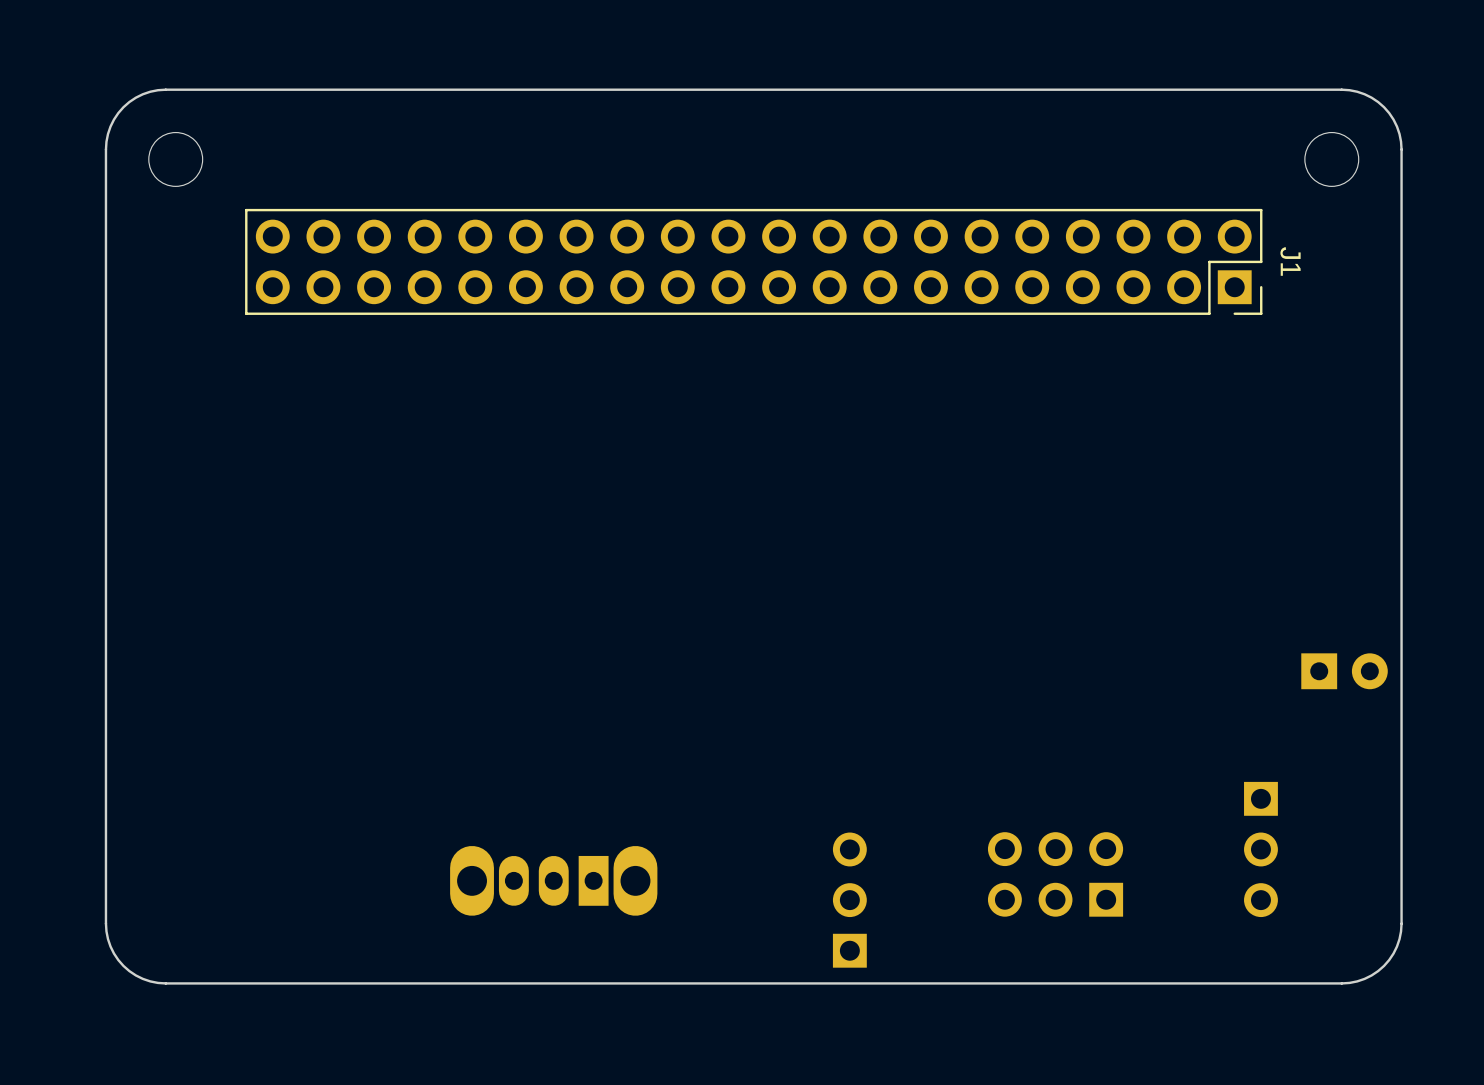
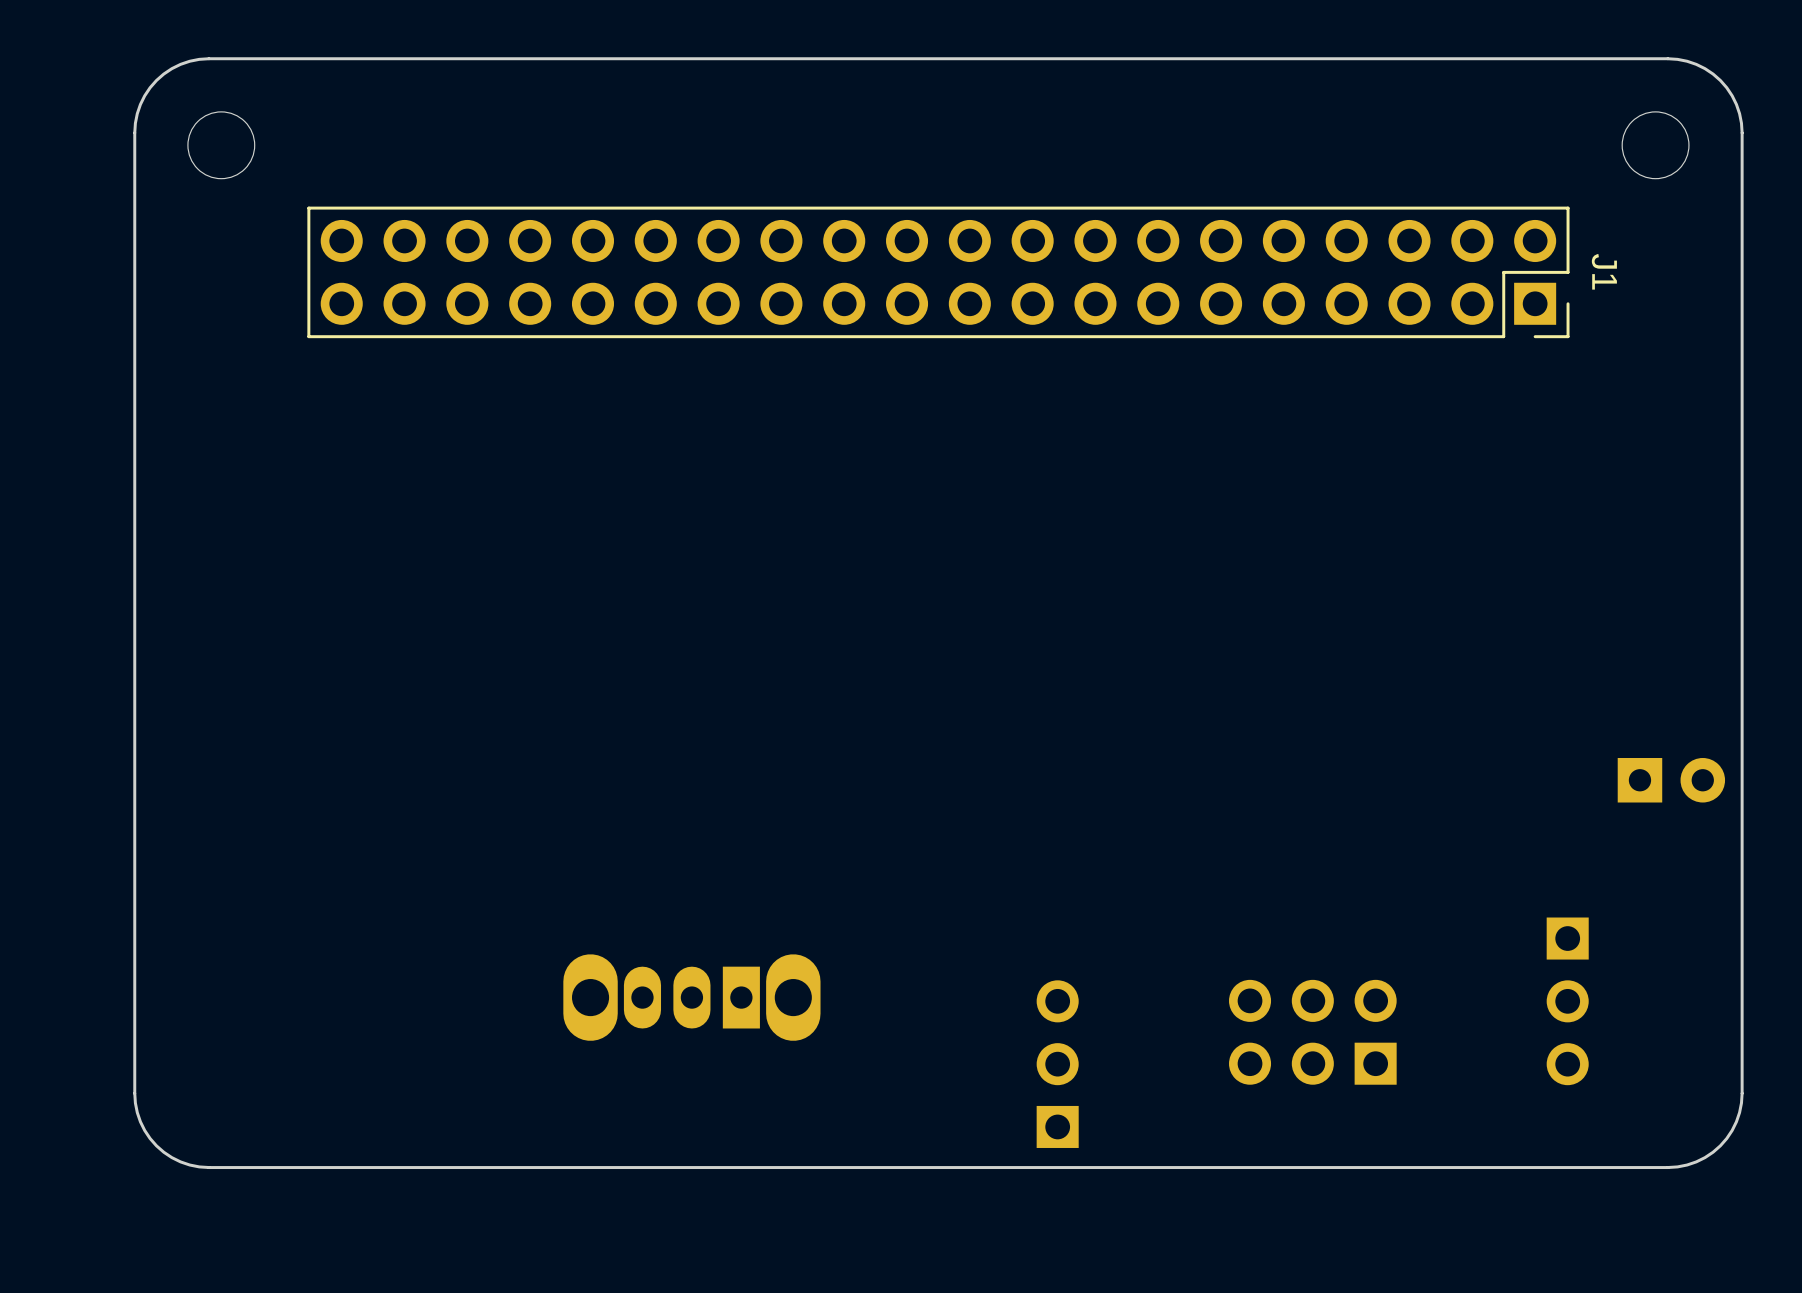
part position: (553, 880) -> (691, 997)

